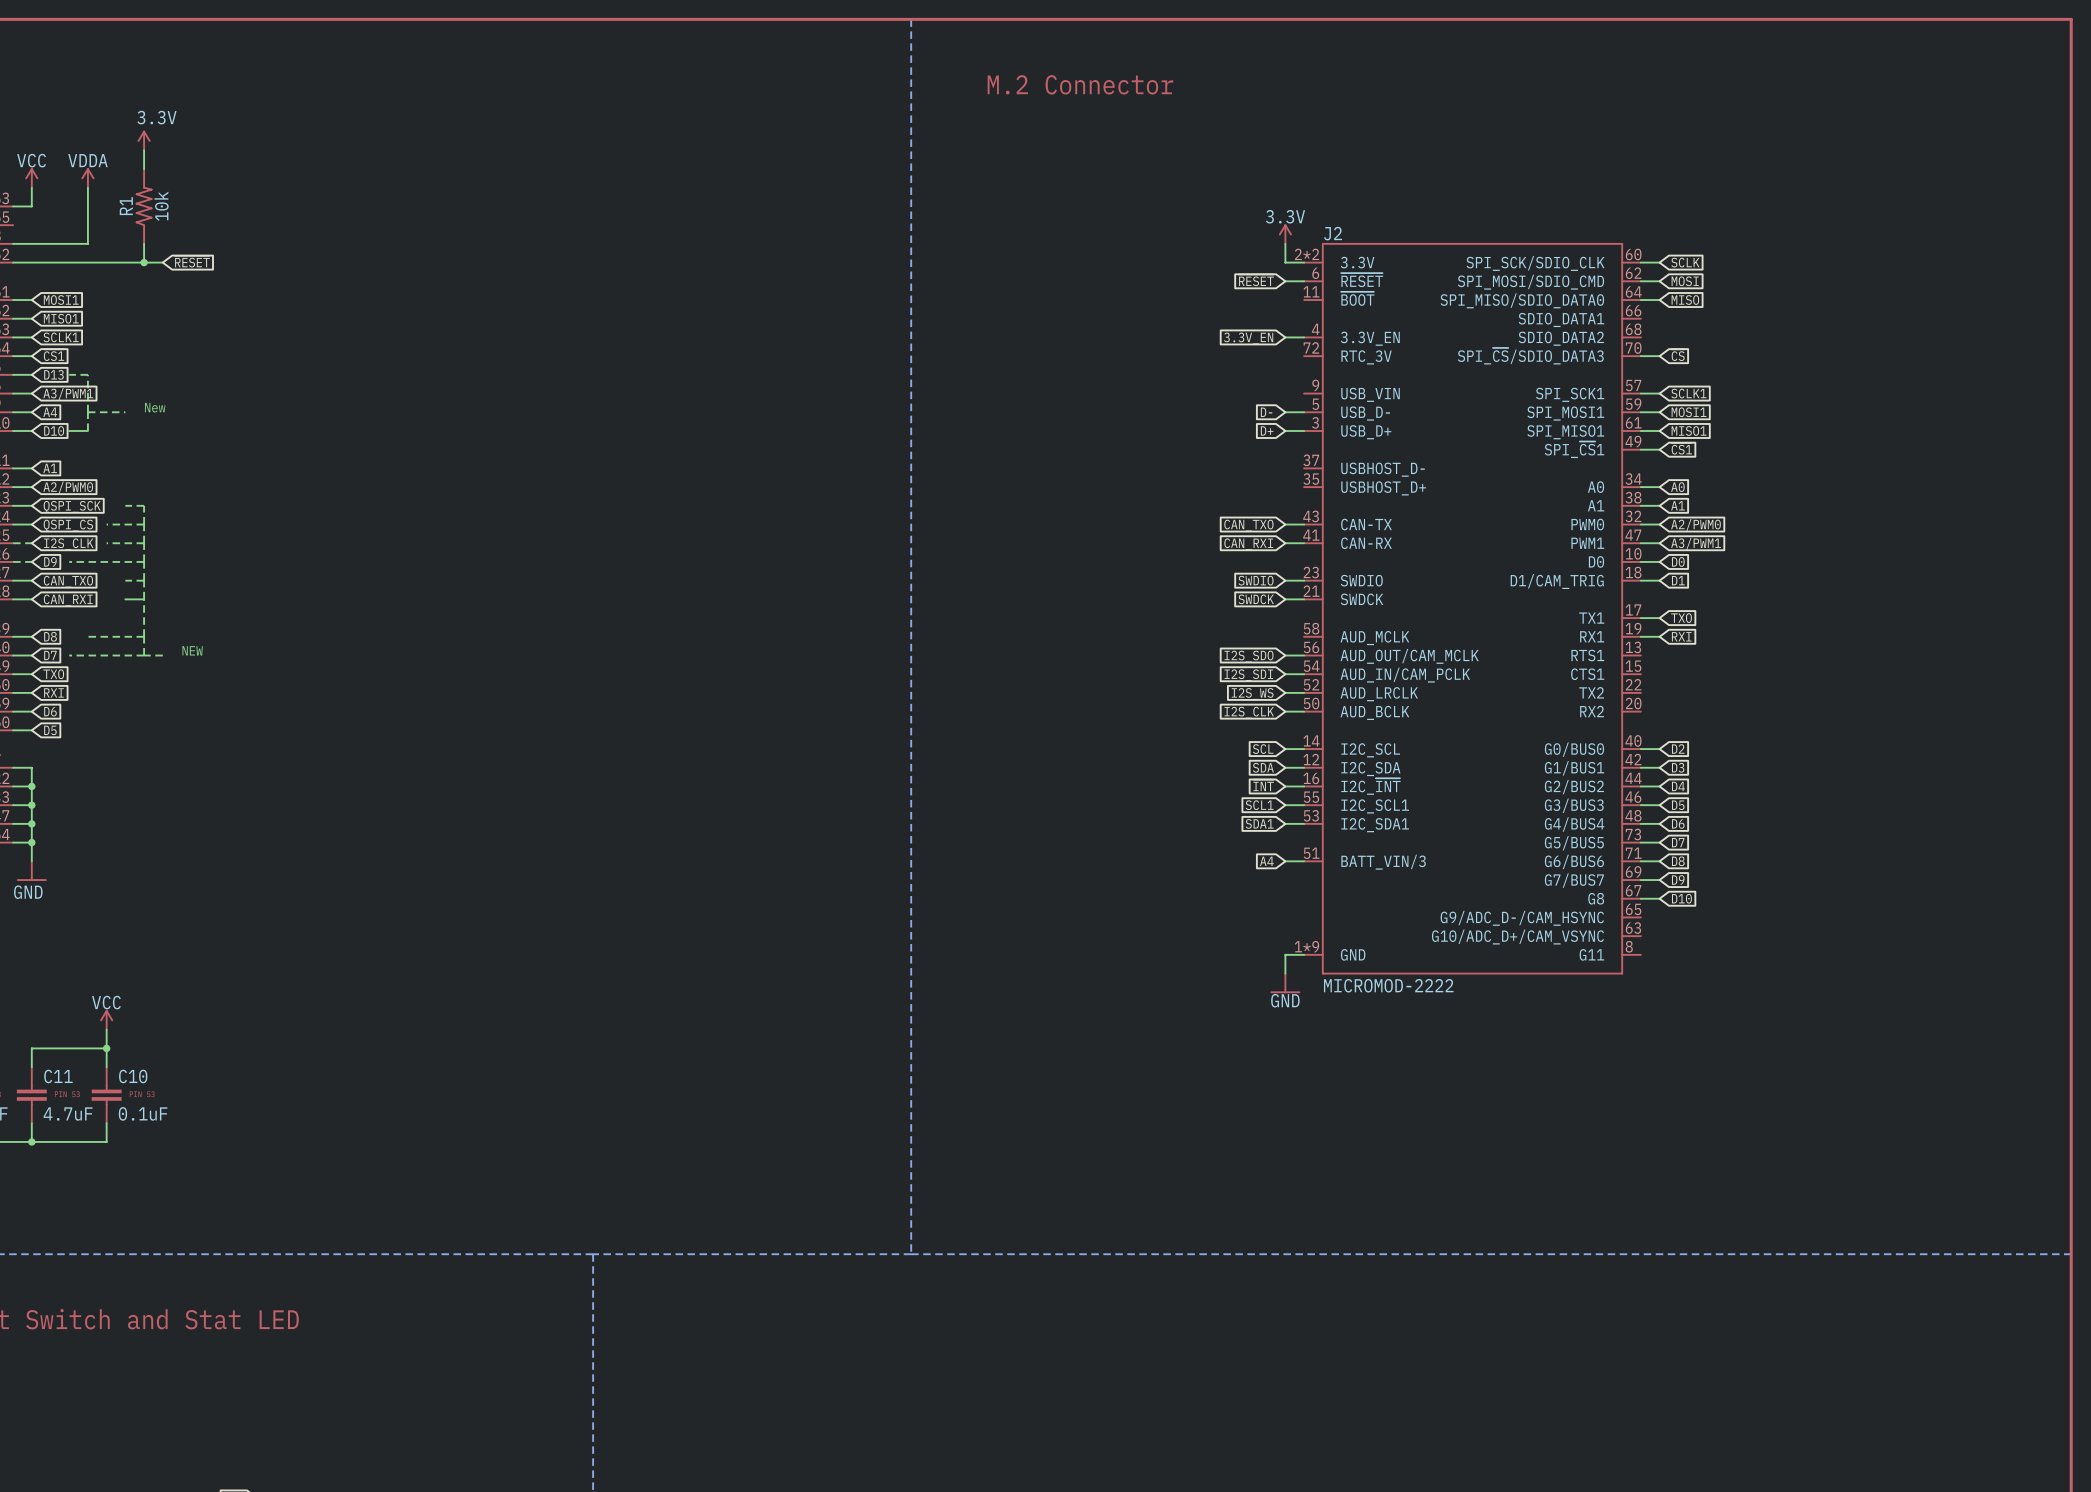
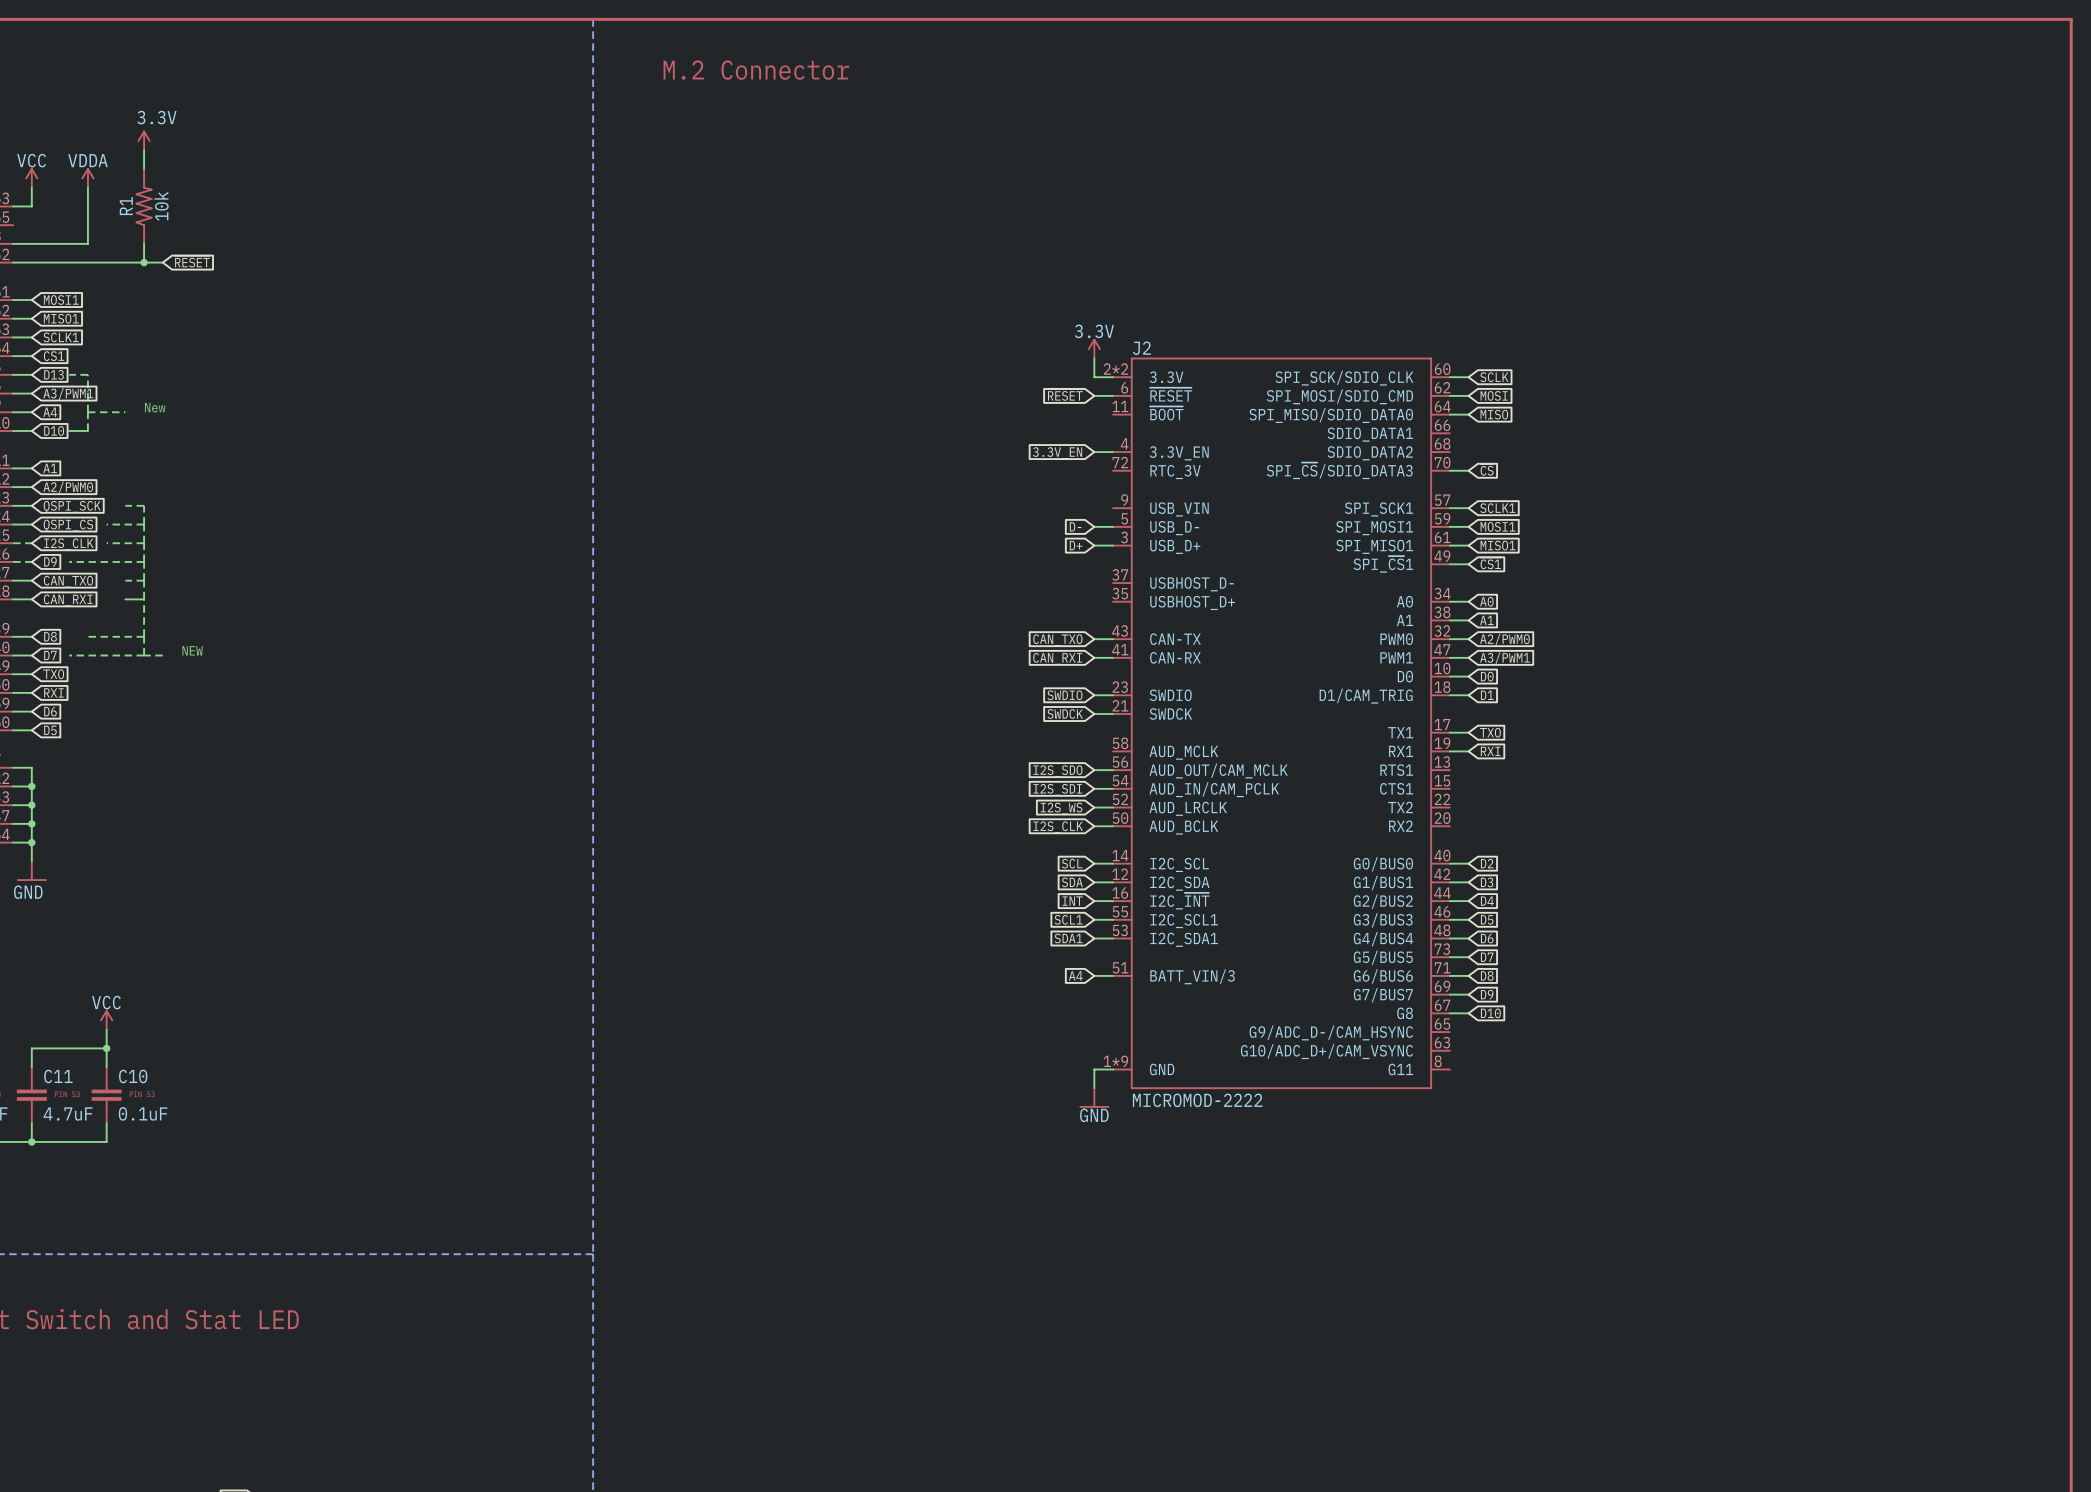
line: (911, 19) (911, 1254) -> none
text: none -> M.2 Connector (756, 70)
text: M.2 Connector (1080, 84) -> none
power symbol: 3.3V (1285, 234) -> none
wire: (1285, 243) (1285, 262) (1304, 262) -> none
wire: (1640, 262) (1659, 262) -> none
global label: SCLK (1685, 262) -> none
global label: ~{RESET} (1256, 280) -> none
wire: (1285, 281) (1304, 281) -> none
wire: (1640, 281) (1659, 281) -> none
global label: MOSI (1685, 281) -> none
wire: (1640, 300) (1659, 300) -> none
global label: MISO (1685, 300) -> none
wire: (1285, 337) (1304, 337) -> (1449, 414) (1468, 414)
global label: 3.3V_EN (1248, 338) -> none
power symbol: none -> 3.3V (1094, 348)
global label: ~{CS} (1678, 355) -> none
wire: (1640, 356) (1659, 356) -> none
wire: none -> (1094, 358) (1094, 377) (1113, 377)
wire: none -> (1449, 377) (1468, 377)
global label: none -> SCLK (1494, 377)
wire: (1640, 393) (1659, 393) -> none
global label: SCLK1 (1688, 393) -> none
global label: none -> ~{RESET} (1065, 394)
wire: none -> (1094, 395) (1113, 395)
global label: none -> MOSI (1494, 395)
global label: D- (1266, 412) -> none
wire: (1285, 412) (1304, 412) -> (1449, 395) (1468, 395)
wire: (1640, 412) (1659, 412) -> none
global label: MOSI1 (1689, 412) -> none
global label: none -> MISO (1494, 414)
global label: D+ (1267, 430) -> none
wire: (1285, 430) (1304, 430) -> (1449, 508) (1468, 508)
wire: (1640, 430) (1659, 430) -> none
global label: MISO1 (1689, 430) -> none
global label: ~{CS1} (1681, 448) -> none
wire: (1640, 449) (1659, 449) -> none
wire: none -> (1094, 452) (1113, 452)
global label: none -> 3.3V_EN (1057, 453)
global label: none -> ~{CS} (1487, 469)
wire: none -> (1449, 470) (1468, 470)
wire: (1640, 487) (1659, 487) -> none
global label: A0 (1677, 487) -> none
wire: (1640, 505) (1659, 505) -> none
global label: A1 (1677, 505) -> none
global label: none -> SCLK1 (1497, 508)
wire: (1285, 524) (1304, 524) -> (1449, 601) (1468, 601)
wire: (1640, 524) (1659, 524) -> none
global label: CAN_TXO (1248, 525) -> none
global label: A2/PWM0 (1696, 525) -> none
global label: none -> D- (1075, 526)
wire: none -> (1094, 526) (1113, 526)
wire: none -> (1449, 526) (1468, 526)
global label: none -> MOSI1 (1498, 526)
wire: (1285, 543) (1304, 543) -> (1449, 620) (1468, 620)
wire: (1640, 543) (1659, 543) -> none
global label: A3/PWM1 (1696, 543) -> none
global label: CAN_RXI (1248, 544) -> none
global label: none -> D+ (1076, 545)
wire: none -> (1094, 545) (1113, 545)
wire: none -> (1449, 545) (1468, 545)
global label: none -> MISO1 (1498, 545)
wire: (1640, 561) (1659, 561) -> none
global label: D0 (1678, 561) -> none
global label: none -> ~{CS1} (1490, 563)
wire: none -> (1449, 564) (1468, 564)
global label: SWDIO (1256, 580) -> none
wire: (1285, 580) (1304, 580) -> (1449, 657) (1468, 657)
wire: (1640, 580) (1659, 580) -> none
global label: D1 (1678, 580) -> none
global label: SWDCK (1256, 599) -> none
wire: (1285, 599) (1304, 599) -> (1449, 676) (1468, 676)
global label: none -> A0 (1486, 601)
J2 position: (1472, 608) -> (1281, 723)
wire: (1640, 618) (1659, 618) -> none
global label: TXO (1681, 618) -> none
global label: none -> A1 (1486, 620)
wire: (1640, 636) (1659, 636) -> none
global label: RXI (1681, 636) -> none
wire: none -> (1094, 639) (1113, 639)
global label: none -> A2/PWM0 (1504, 639)
global label: none -> CAN_TXO (1057, 640)
wire: (1285, 655) (1304, 655) -> (1449, 732) (1468, 732)
global label: I2S_SDO (1249, 656) -> none
wire: none -> (1094, 657) (1113, 657)
global label: none -> CAN_RXI (1057, 658)
global label: none -> A3/PWM1 (1505, 658)
wire: (1285, 674) (1304, 674) -> (1449, 751) (1468, 751)
global label: I2S_SDI (1248, 675) -> none
global label: none -> D0 (1487, 676)
wire: (1285, 692) (1304, 692) -> (1449, 639) (1468, 639)
global label: I2S_WS (1252, 693) -> none
global label: none -> SWDIO (1064, 695)
wire: none -> (1094, 695) (1113, 695)
global label: none -> D1 (1487, 695)
wire: (1285, 711) (1304, 711) -> (1449, 695) (1468, 695)
global label: I2S_CLK (1249, 712) -> none
global label: none -> SWDCK (1065, 713)
wire: none -> (1094, 713) (1113, 713)
global label: none -> TXO (1490, 732)
global label: D2 (1678, 748) -> none
global label: SCL (1263, 749) -> none
wire: (1285, 749) (1304, 749) -> none
wire: (1640, 749) (1659, 749) -> none
global label: none -> RXI (1490, 751)
global label: SDA (1263, 767) -> none
wire: (1285, 767) (1304, 767) -> none
wire: (1640, 767) (1659, 767) -> none
global label: D3 (1678, 767) -> none
wire: none -> (1094, 770) (1113, 770)
global label: none -> I2S_SDO (1057, 771)
global label: ~{INT} (1263, 785) -> none
wire: (1285, 786) (1304, 786) -> (1449, 863) (1468, 863)
wire: (1640, 786) (1659, 786) -> none
global label: D4 (1678, 786) -> none
wire: none -> (1094, 788) (1113, 788)
global label: none -> I2S_SDI (1057, 789)
global label: SCL1 (1259, 805) -> none
wire: (1285, 805) (1304, 805) -> (1449, 882) (1468, 882)
wire: (1640, 805) (1659, 805) -> none
global label: D5 (1678, 805) -> none
wire: none -> (1094, 807) (1113, 807)
global label: none -> I2S_WS (1061, 808)
global label: SDA1 (1259, 823) -> none
wire: (1285, 823) (1304, 823) -> (1449, 901) (1468, 901)
wire: (1640, 823) (1659, 823) -> none
global label: D6 (1678, 823) -> none
wire: none -> (1094, 826) (1113, 826)
global label: none -> I2S_CLK (1058, 827)
wire: (1640, 842) (1659, 842) -> none
global label: D7 (1678, 842) -> none
global label: A4 (1266, 861) -> none
wire: (1285, 861) (1304, 861) -> (1449, 938) (1468, 938)
wire: (1640, 861) (1659, 861) -> none
global label: D8 (1678, 861) -> none
global label: none -> SCL (1072, 863)
wire: none -> (1094, 863) (1113, 863)
global label: none -> D2 (1487, 863)
global label: D9 (1678, 879) -> none
wire: (1640, 880) (1659, 880) -> none
global label: none -> SDA (1072, 882)
wire: none -> (1094, 882) (1113, 882)
global label: none -> D3 (1487, 882)
wire: (1640, 898) (1659, 898) -> none
global label: D10 (1681, 898) -> none
global label: none -> ~{INT} (1072, 900)
wire: none -> (1094, 901) (1113, 901)
global label: none -> D4 (1487, 901)
global label: none -> SCL1 (1068, 919)
wire: none -> (1094, 919) (1113, 919)
wire: none -> (1449, 919) (1468, 919)
global label: none -> D5 (1487, 919)
global label: none -> SDA1 (1068, 938)
wire: none -> (1094, 938) (1113, 938)
global label: none -> D6 (1487, 938)
wire: (1304, 954) (1285, 954) (1285, 973) -> none
wire: none -> (1449, 957) (1468, 957)
global label: none -> D7 (1487, 957)
global label: none -> A4 (1075, 975)
wire: none -> (1094, 975) (1113, 975)
wire: none -> (1449, 975) (1468, 975)
global label: none -> D8 (1487, 975)
power symbol: GND (1285, 983) -> none
wire: none -> (1449, 994) (1468, 994)
global label: none -> D9 (1487, 994)
wire: none -> (1449, 1013) (1468, 1013)
global label: none -> D10 (1490, 1013)
wire: none -> (1113, 1069) (1094, 1069) (1094, 1088)
power symbol: none -> GND (1094, 1098)
line: (593, 1254) (911, 1254) -> (593, 1254) (593, 19)
line: (911, 1254) (2071, 1254) -> none

